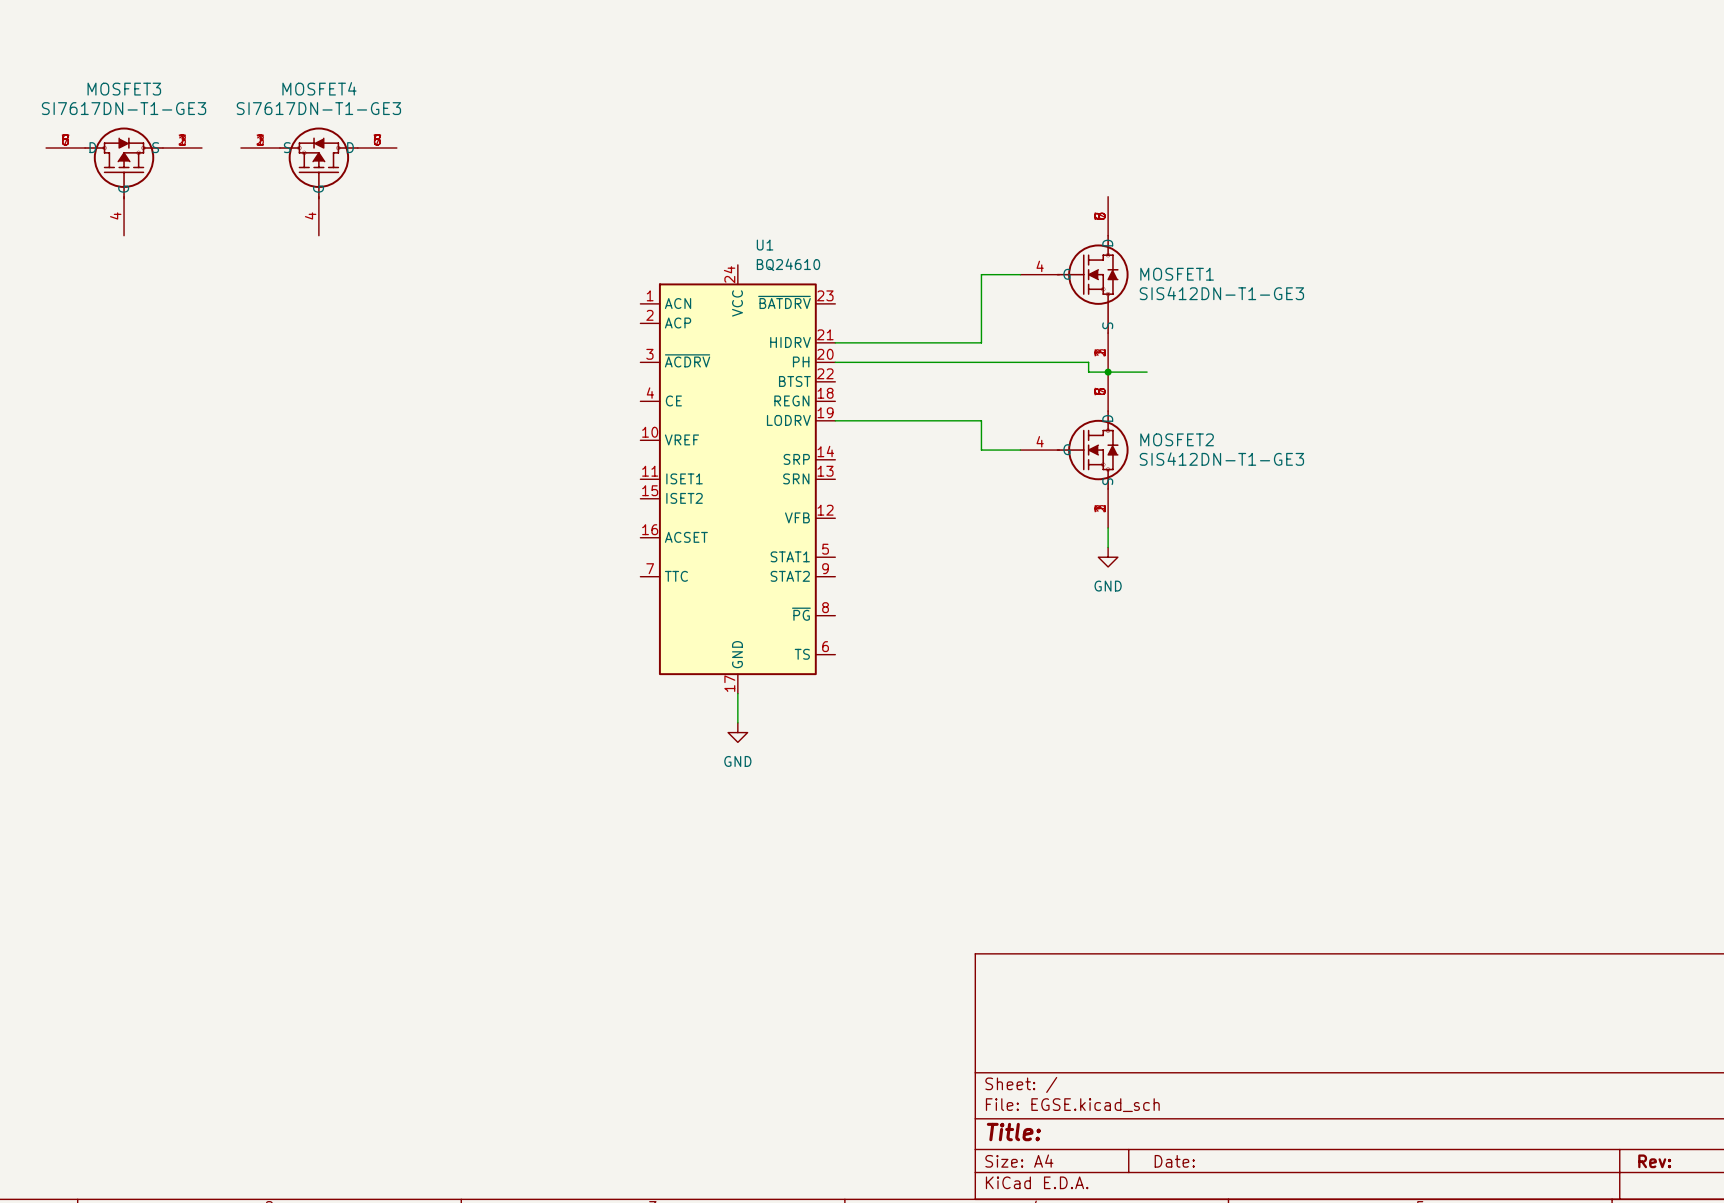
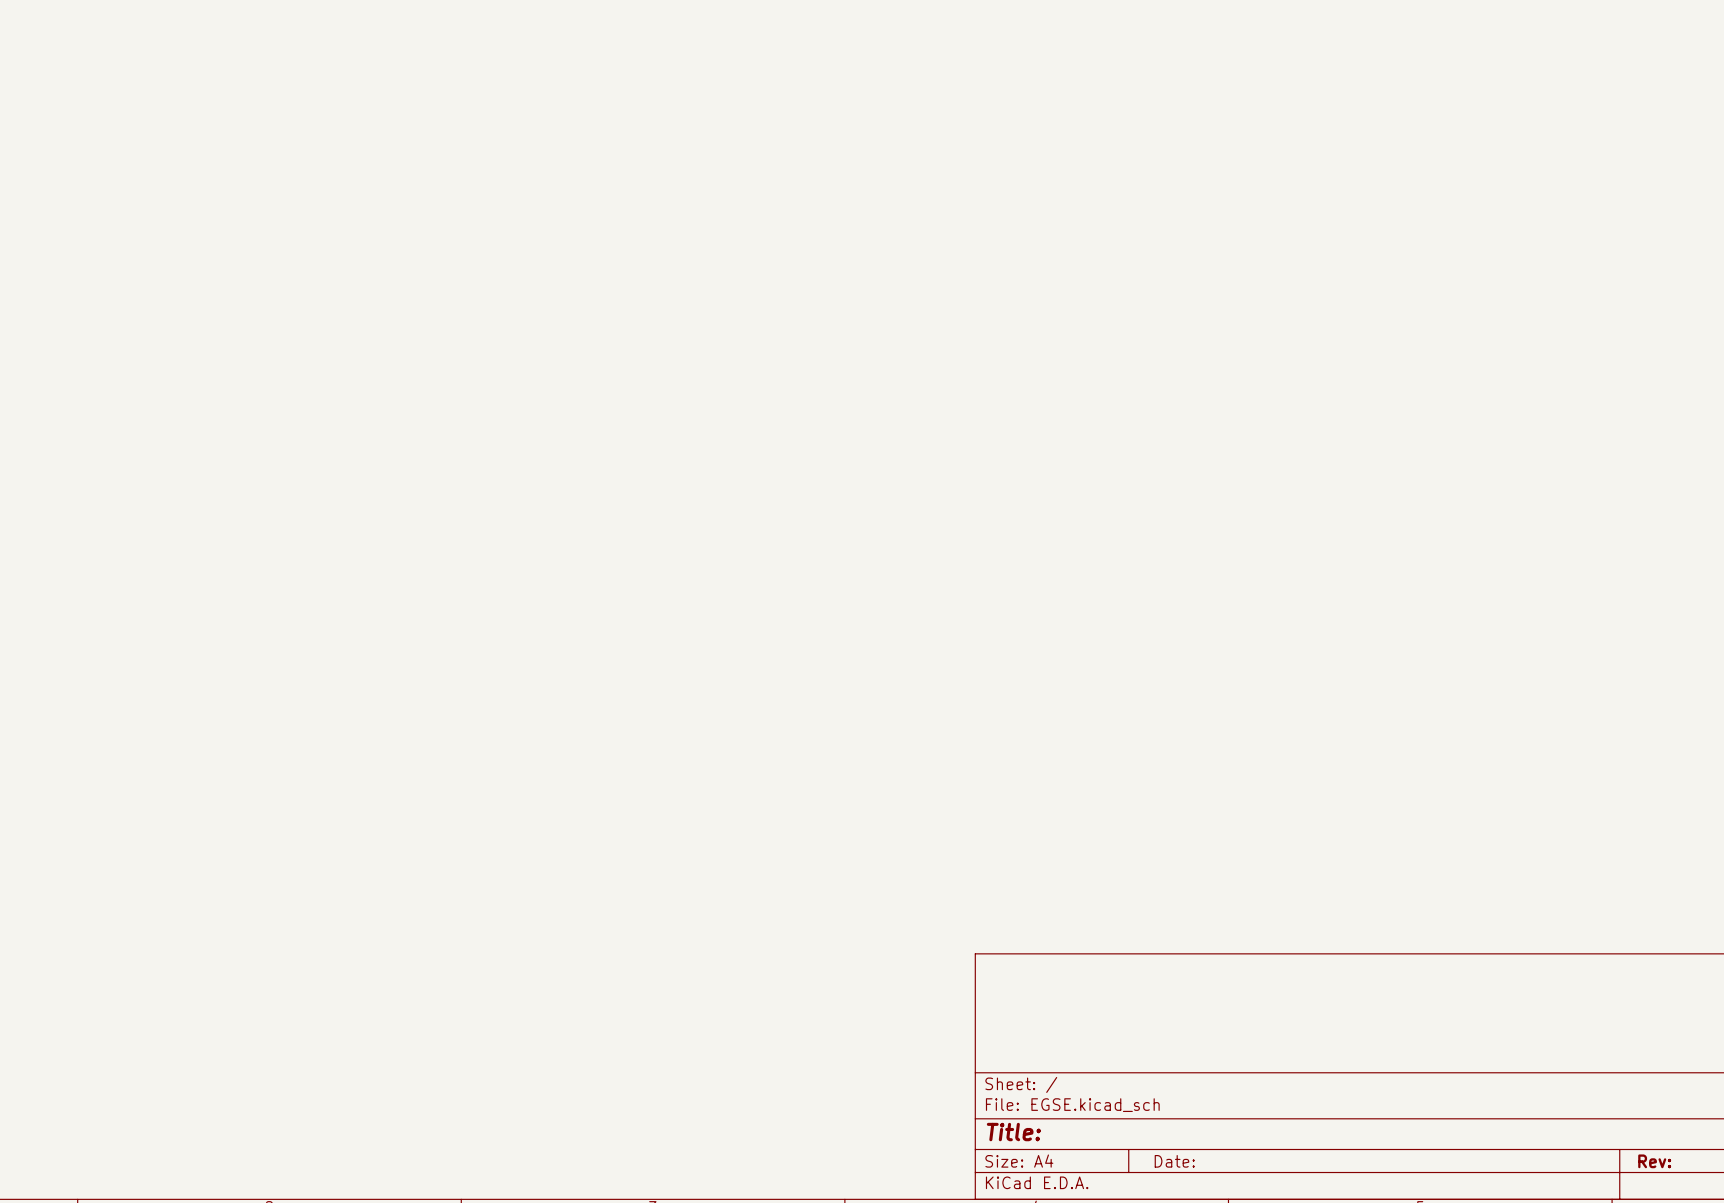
MOSFET3: SI7617DN-T1-GE3 (124, 181) -> none
MOSFET4: SI7617DN-T1-GE3 (318, 181) -> none
wire: (1020, 274) (981, 274) (981, 342) (835, 342) -> none
MOSFET1: SIS412DN-T1-GE3 (1074, 284) -> none
wire: (835, 362) (1088, 362) (1088, 372) (1147, 372) -> none
junction: (1108, 372) -> none
wire: (835, 420) (981, 420) (981, 450) (1020, 450) -> none
MOSFET2: SIS412DN-T1-GE3 (1074, 450) -> none
U1: BQ24610 (737, 479) -> none
wire: (1108, 527) (1108, 547) -> none
power symbol: GND (1108, 557) -> none
wire: (737, 693) (737, 722) -> none
power symbol: GND (737, 732) -> none

